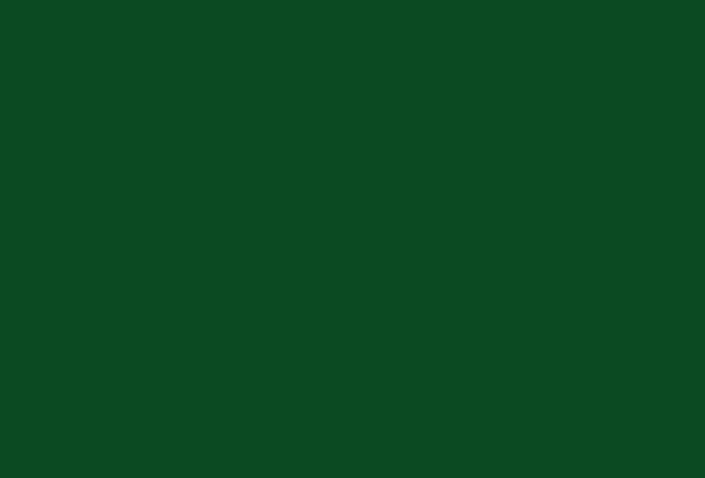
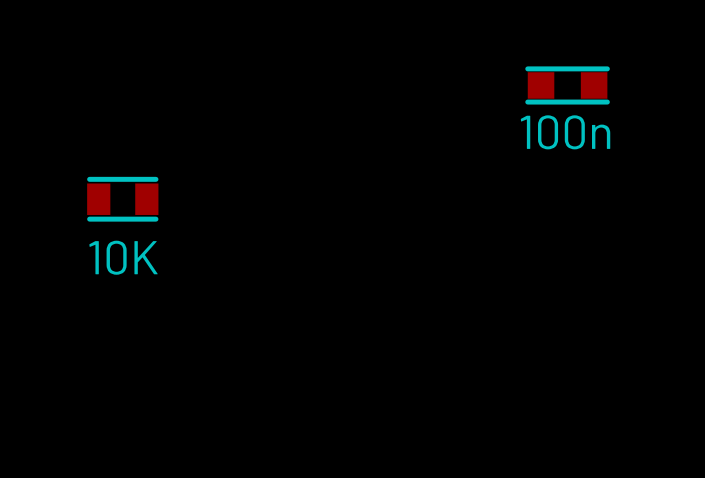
part: none -> 100n (567, 85)
part: none -> 10K (122, 199)

